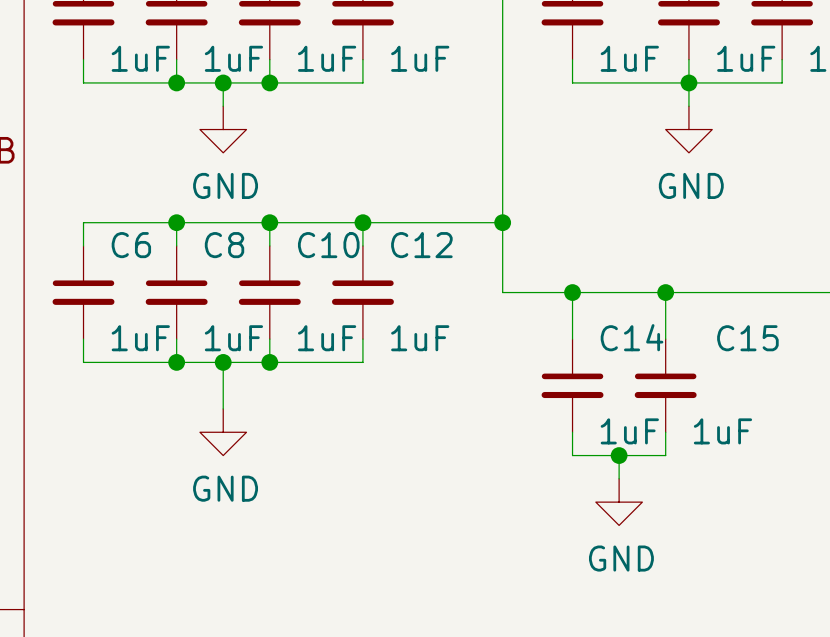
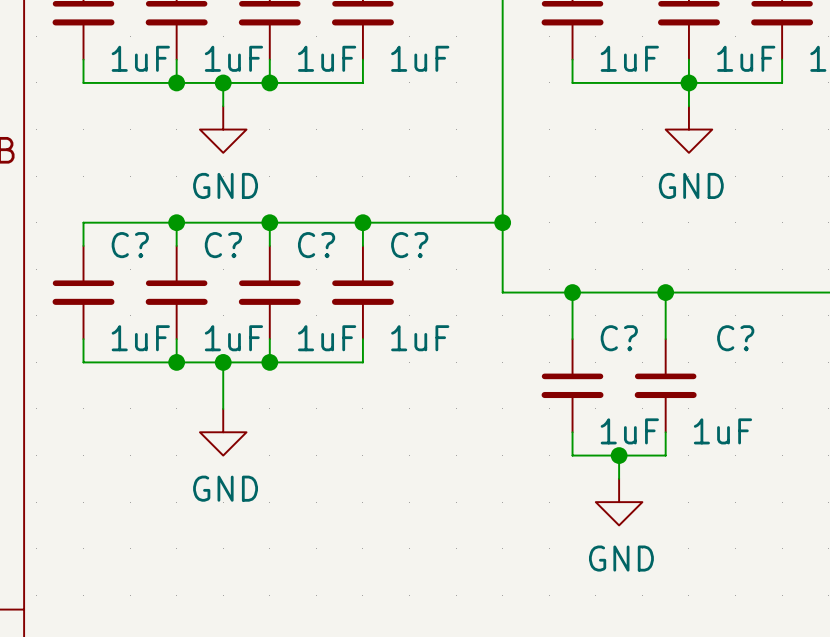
C6 name: C6 (131, 245) -> C? (130, 245)
C8 name: C8 (224, 245) -> C? (223, 245)
C10 name: C10 (328, 245) -> C? (316, 245)
C12 name: C12 (421, 245) -> C? (409, 245)
C14 name: C14 (632, 337) -> C? (619, 338)
C15 name: C15 (747, 338) -> C? (735, 338)

